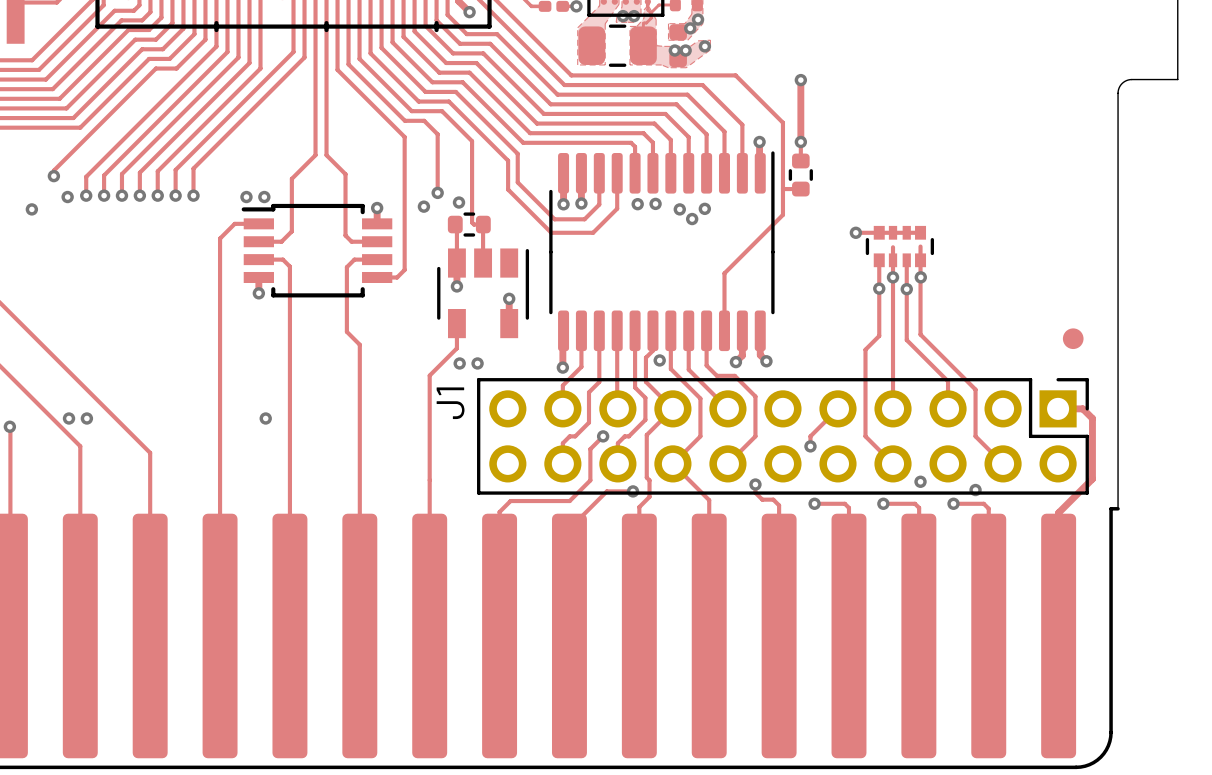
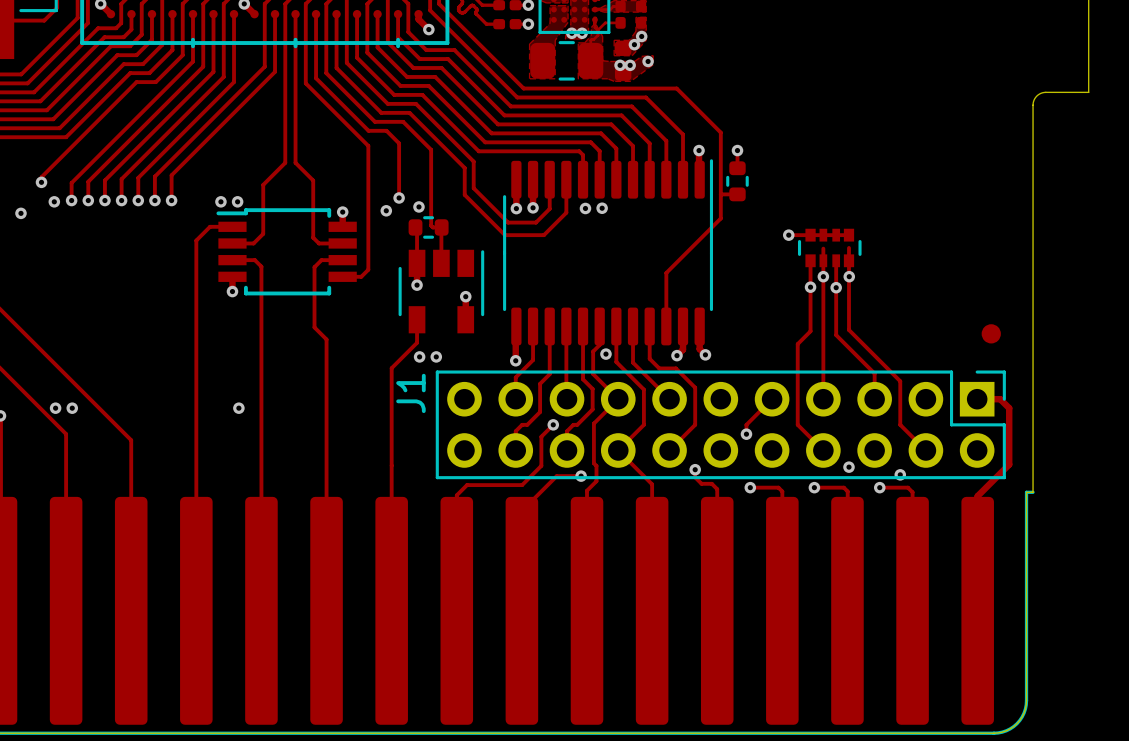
track: (800, 80) (800, 141) -> none
via: (800, 80) -> none
via: (704, 208) -> none
via: (679, 209) -> none
via: (692, 219) -> none

